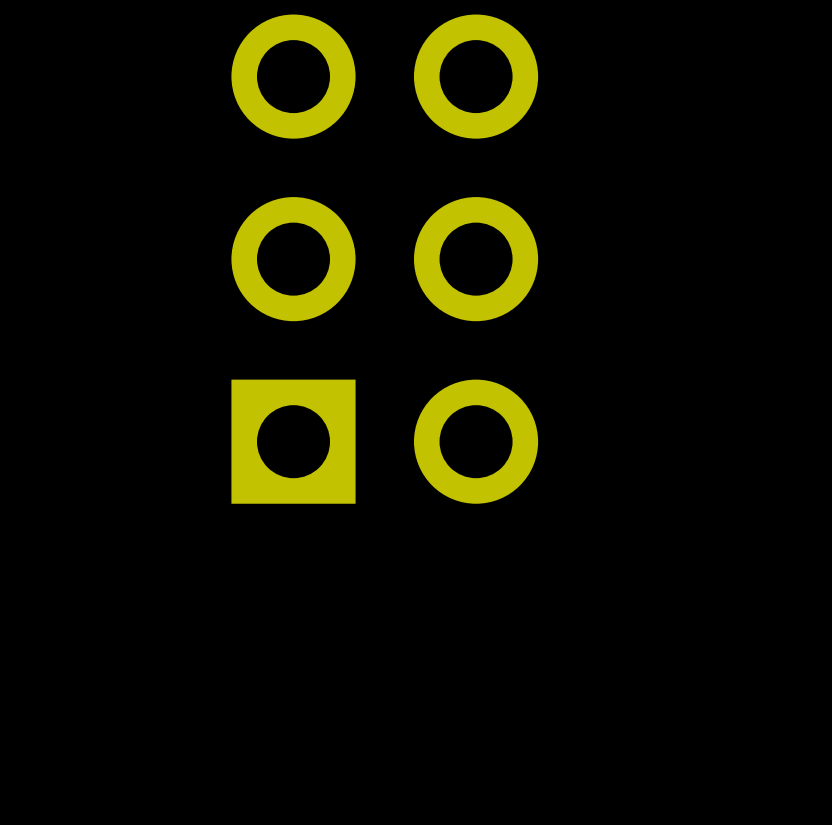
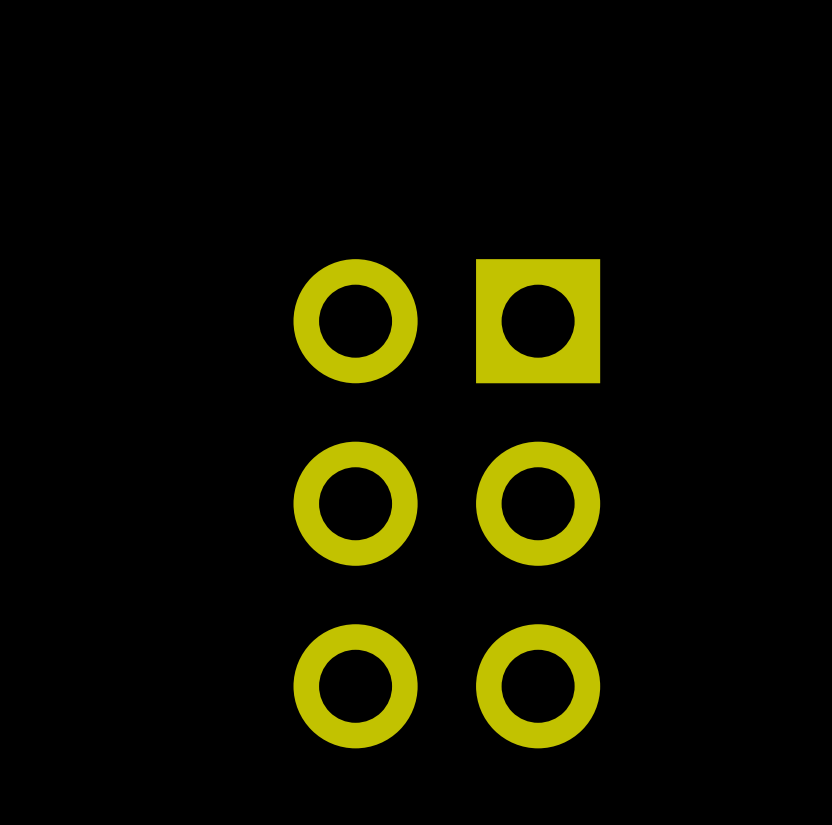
part rotation: 0° (384, 259) -> 180° (446, 503)

